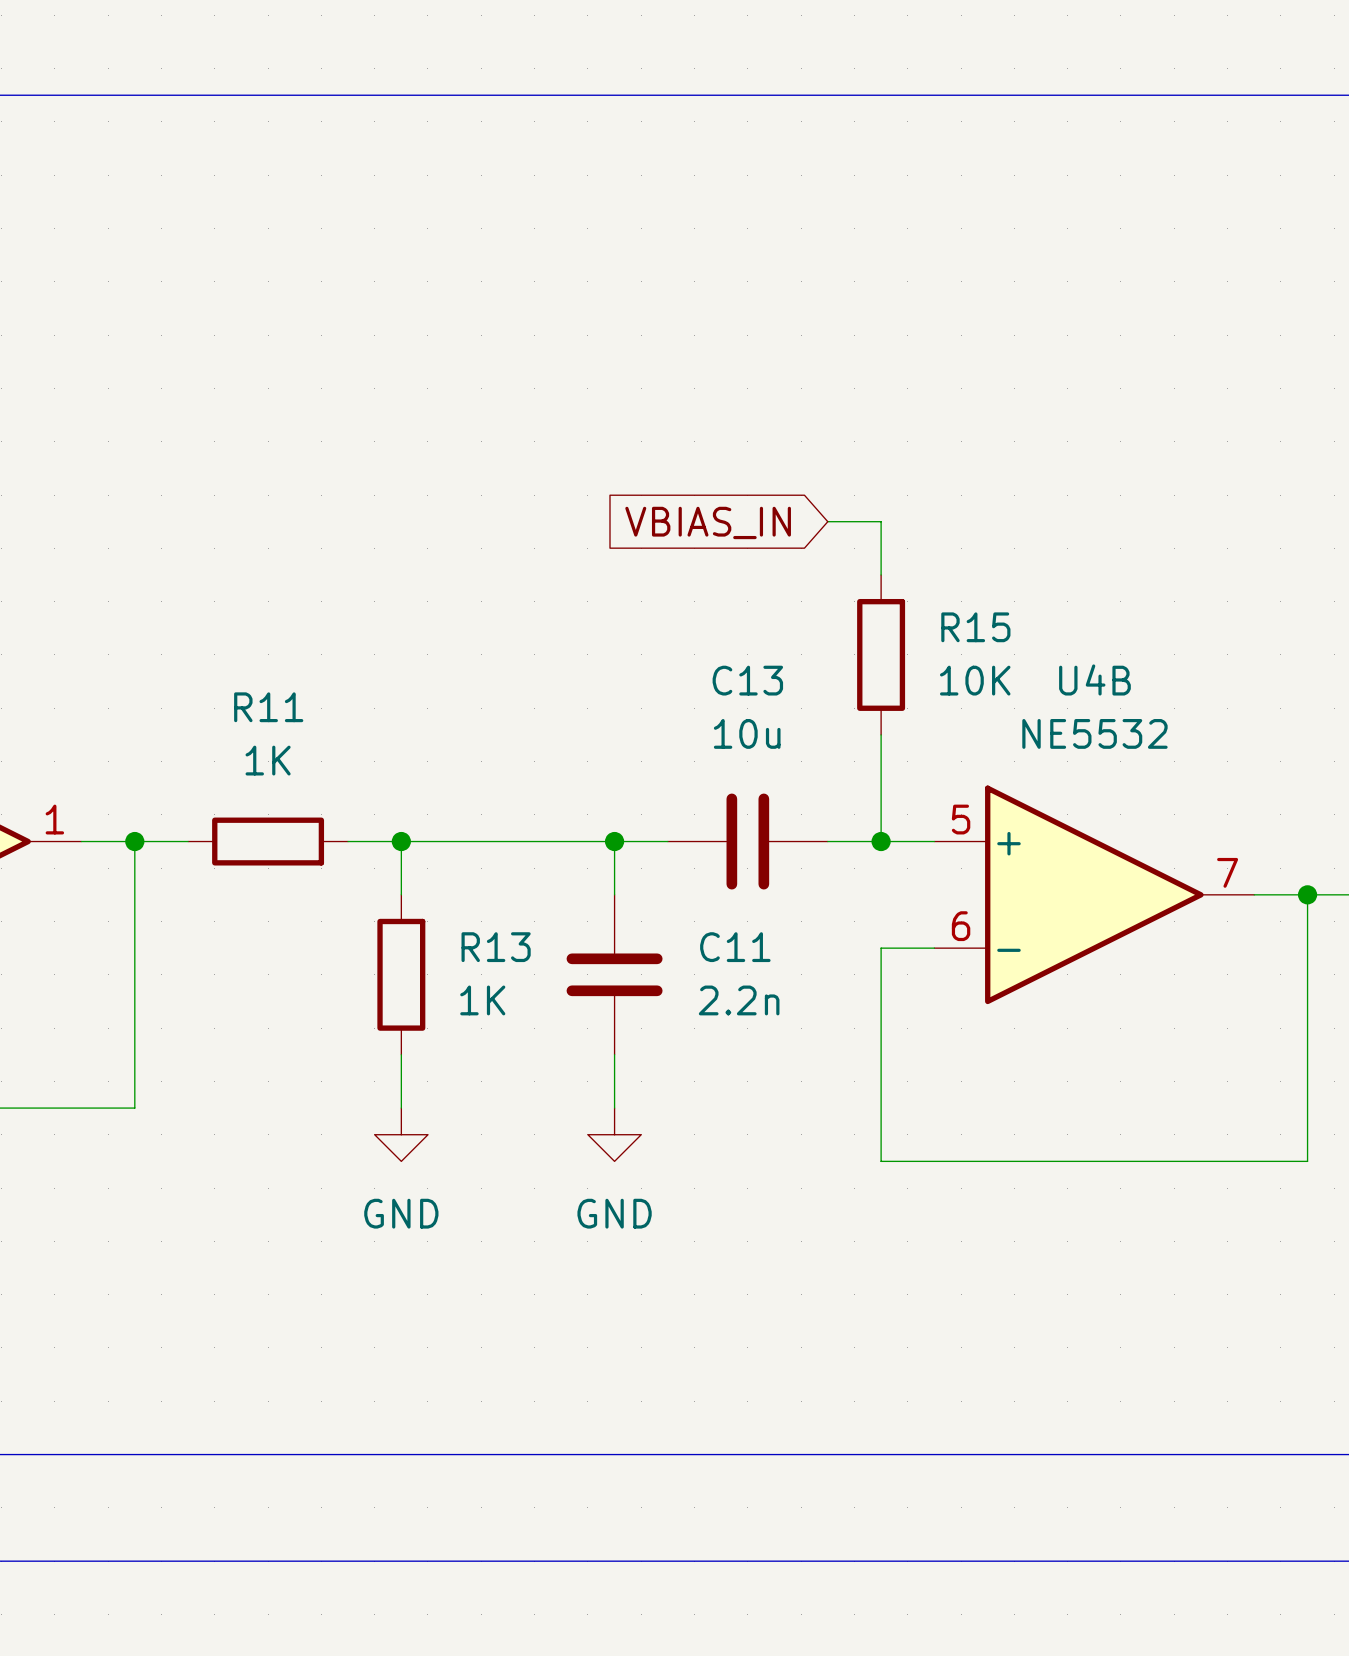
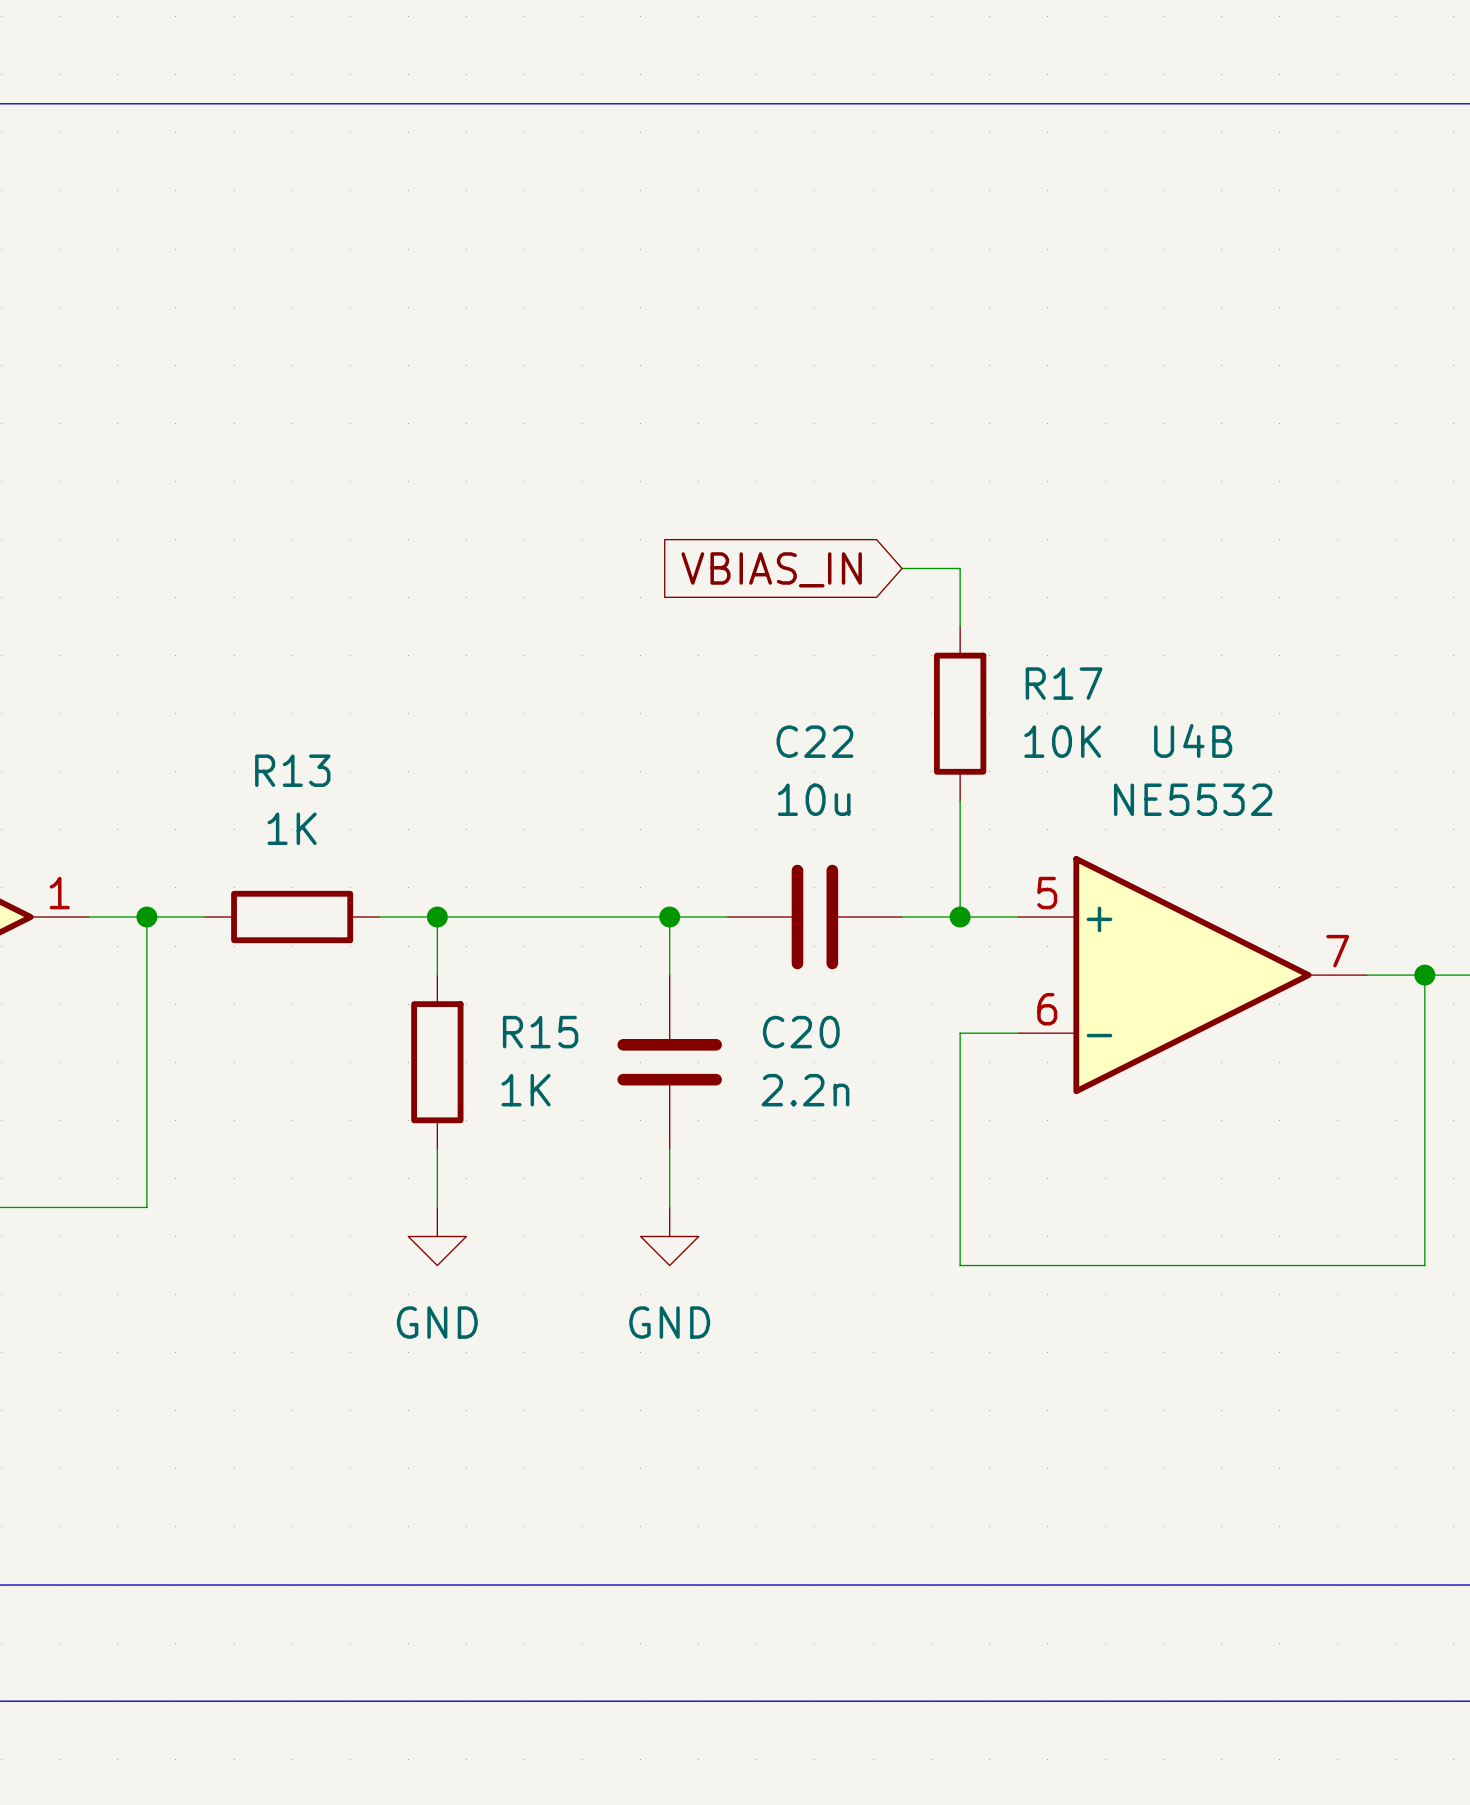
R15 name: R15 (975, 627) -> R17 (1064, 683)
C13 name: C13 (747, 680) -> C22 (814, 741)
R11 name: R11 (268, 707) -> R13 (292, 770)
R13 name: R13 (496, 947) -> R15 (540, 1032)
C11 name: C11 (735, 947) -> C20 (801, 1032)

